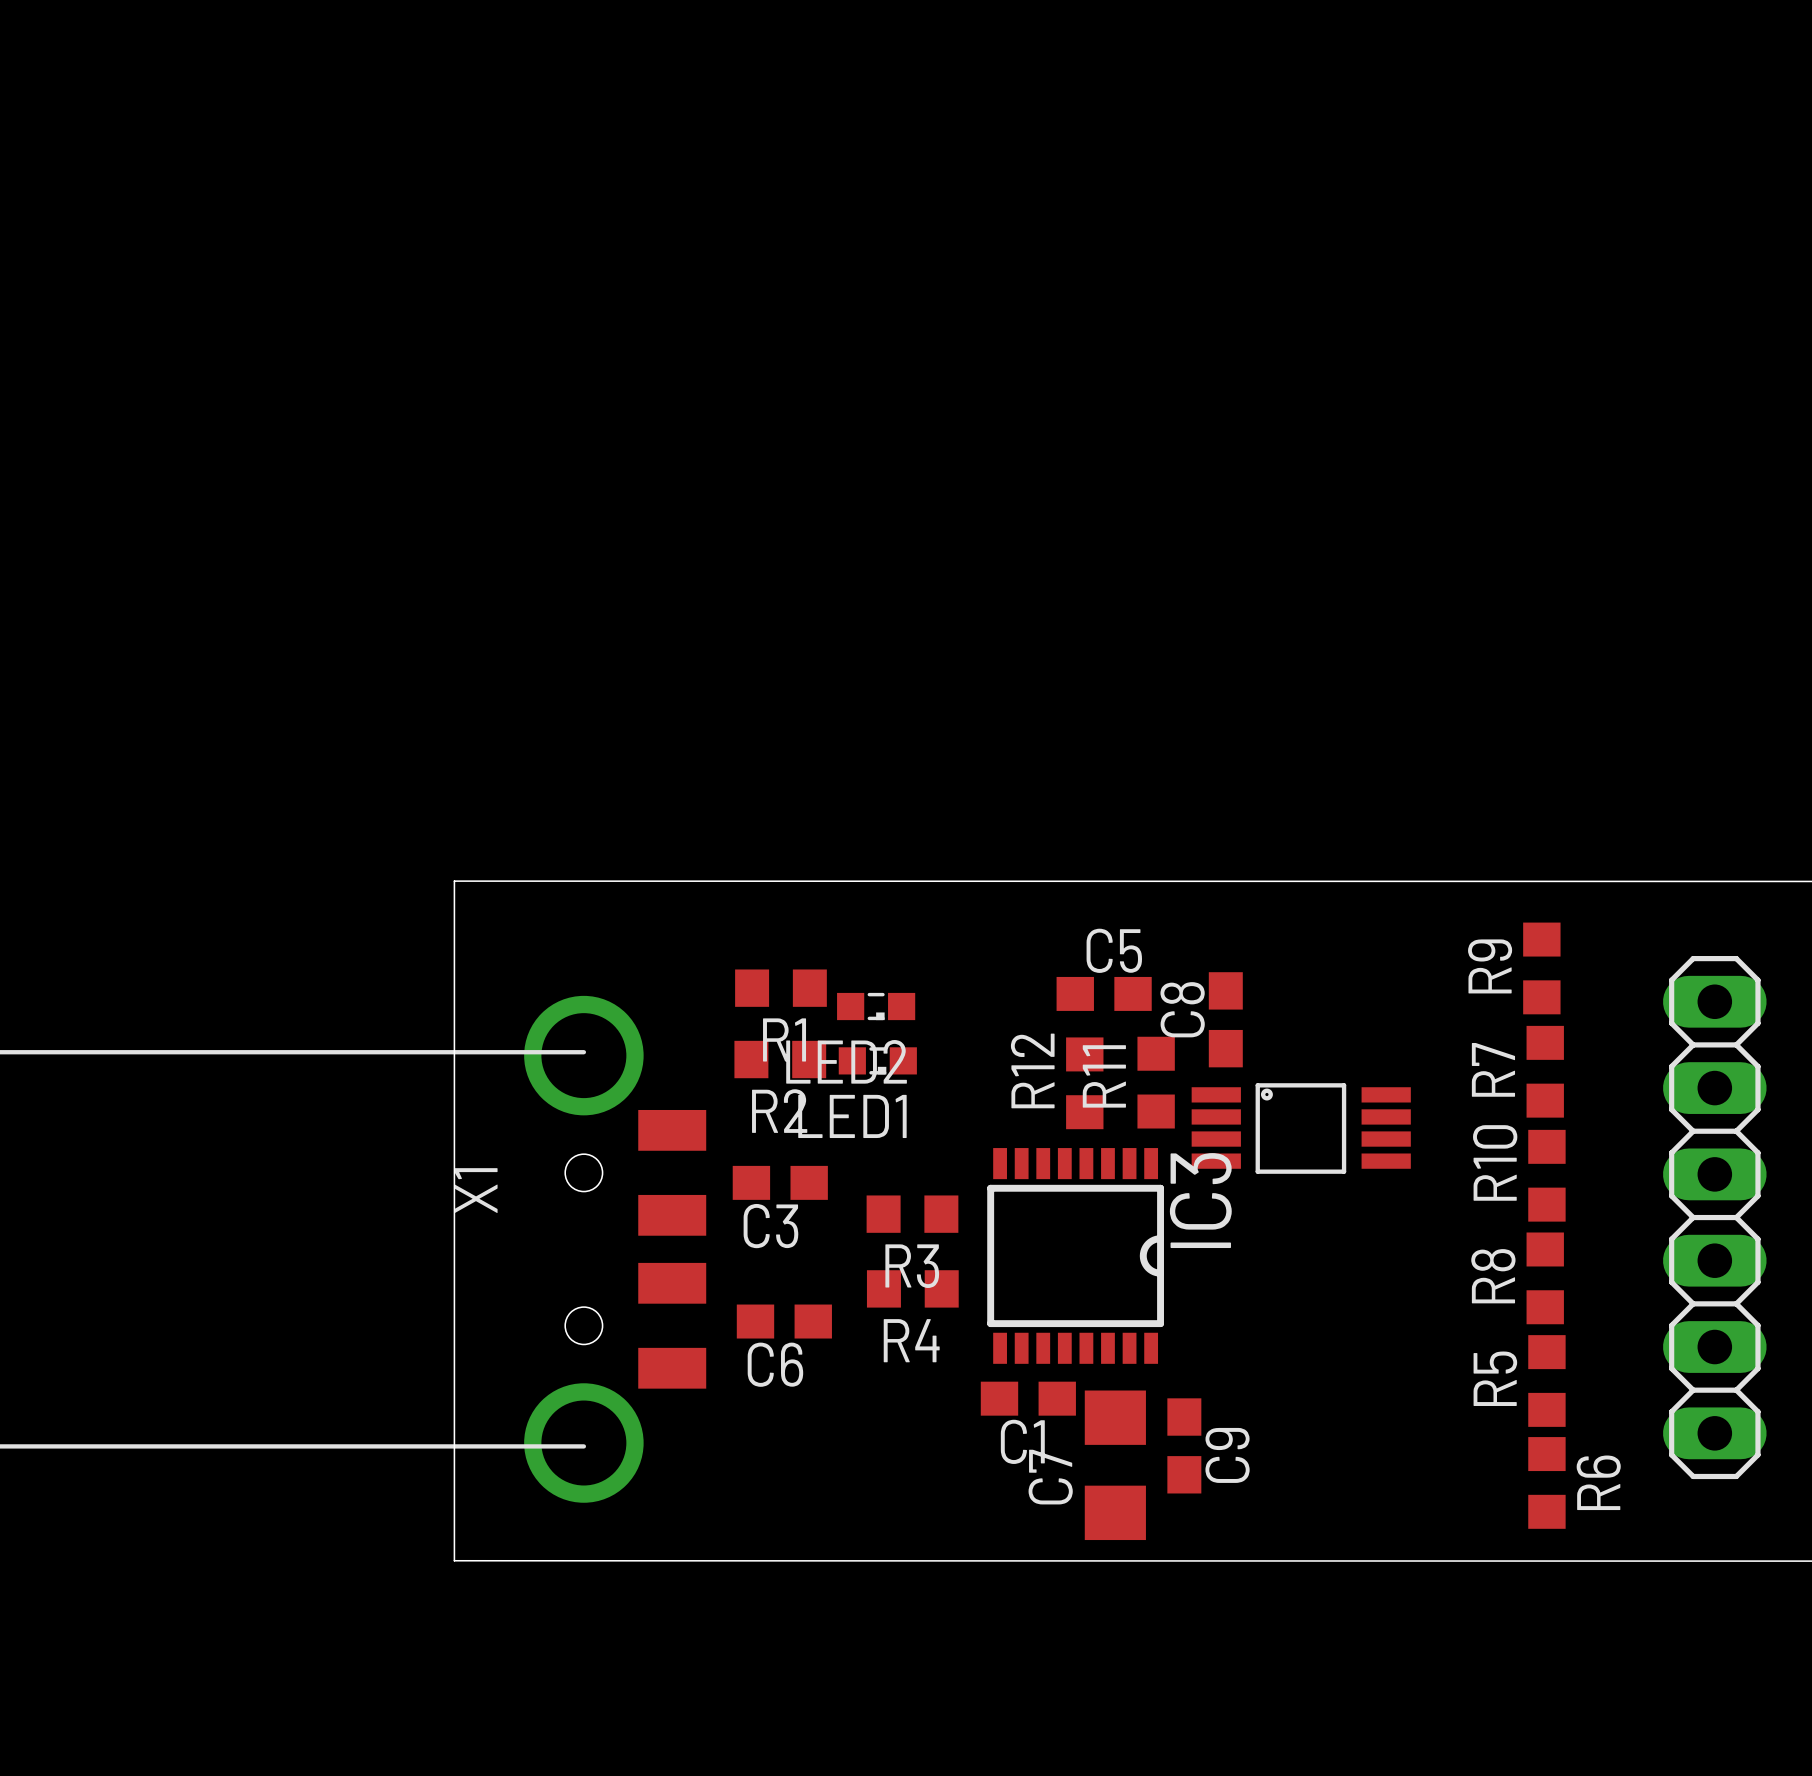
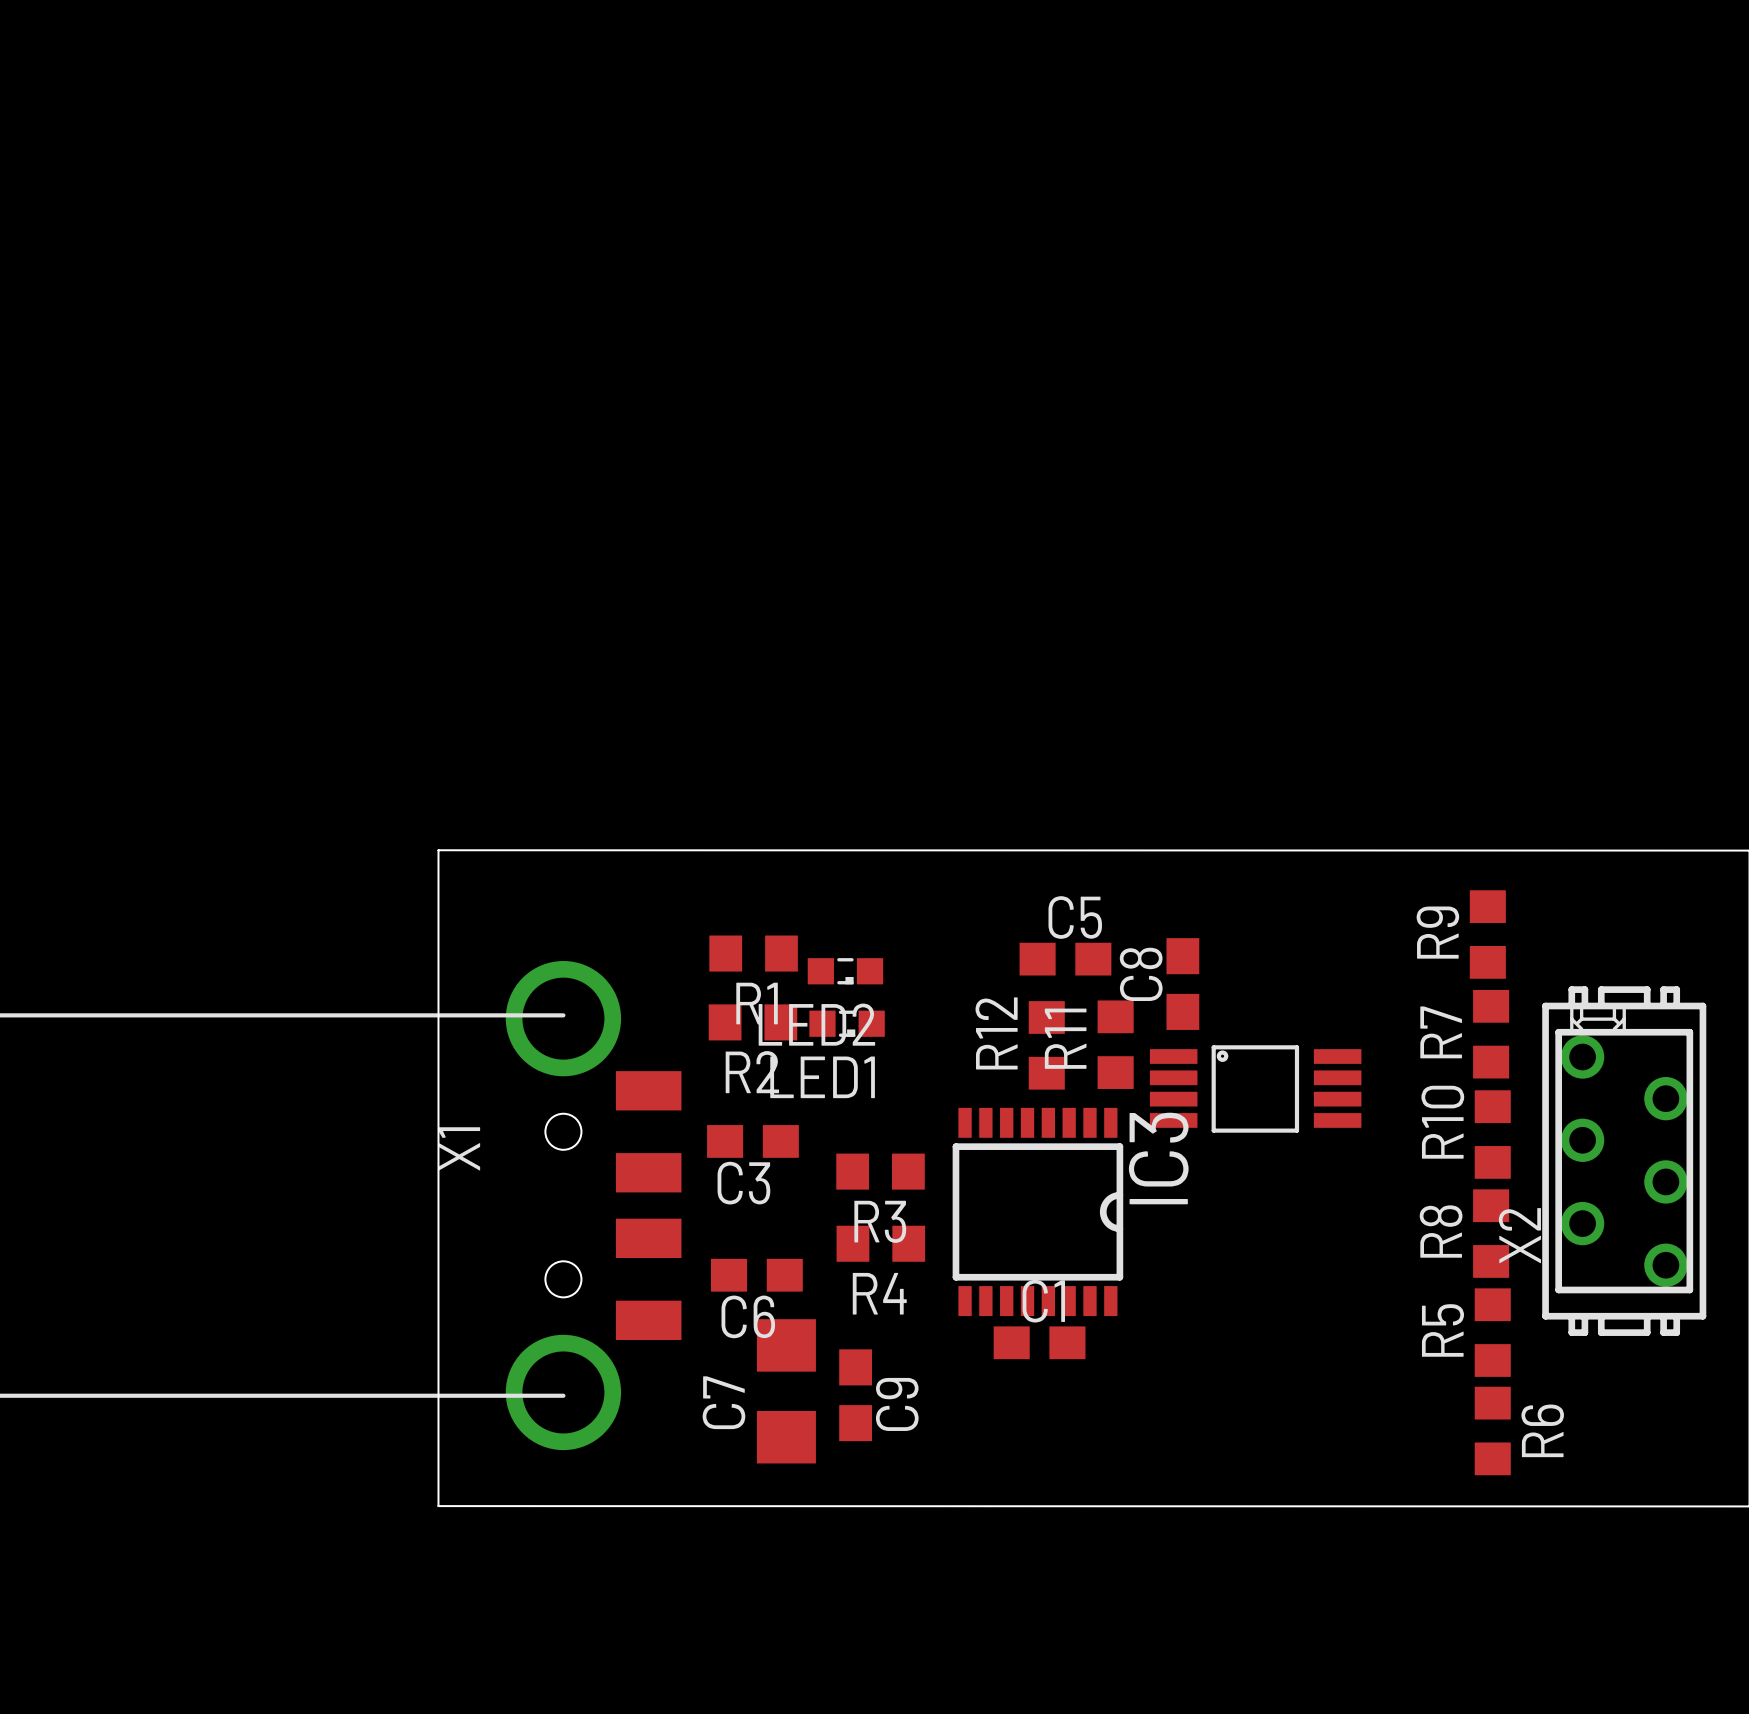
X2: none -> (1624, 1161)
part: (1714, 1217) -> none
C1 position: (1028, 1398) -> (1039, 1342)
C1 name position: C1 (1022, 1441) -> C1 (1043, 1301)
C9 position: (1184, 1445) -> (855, 1395)
C7 position: (1115, 1465) -> (786, 1391)

